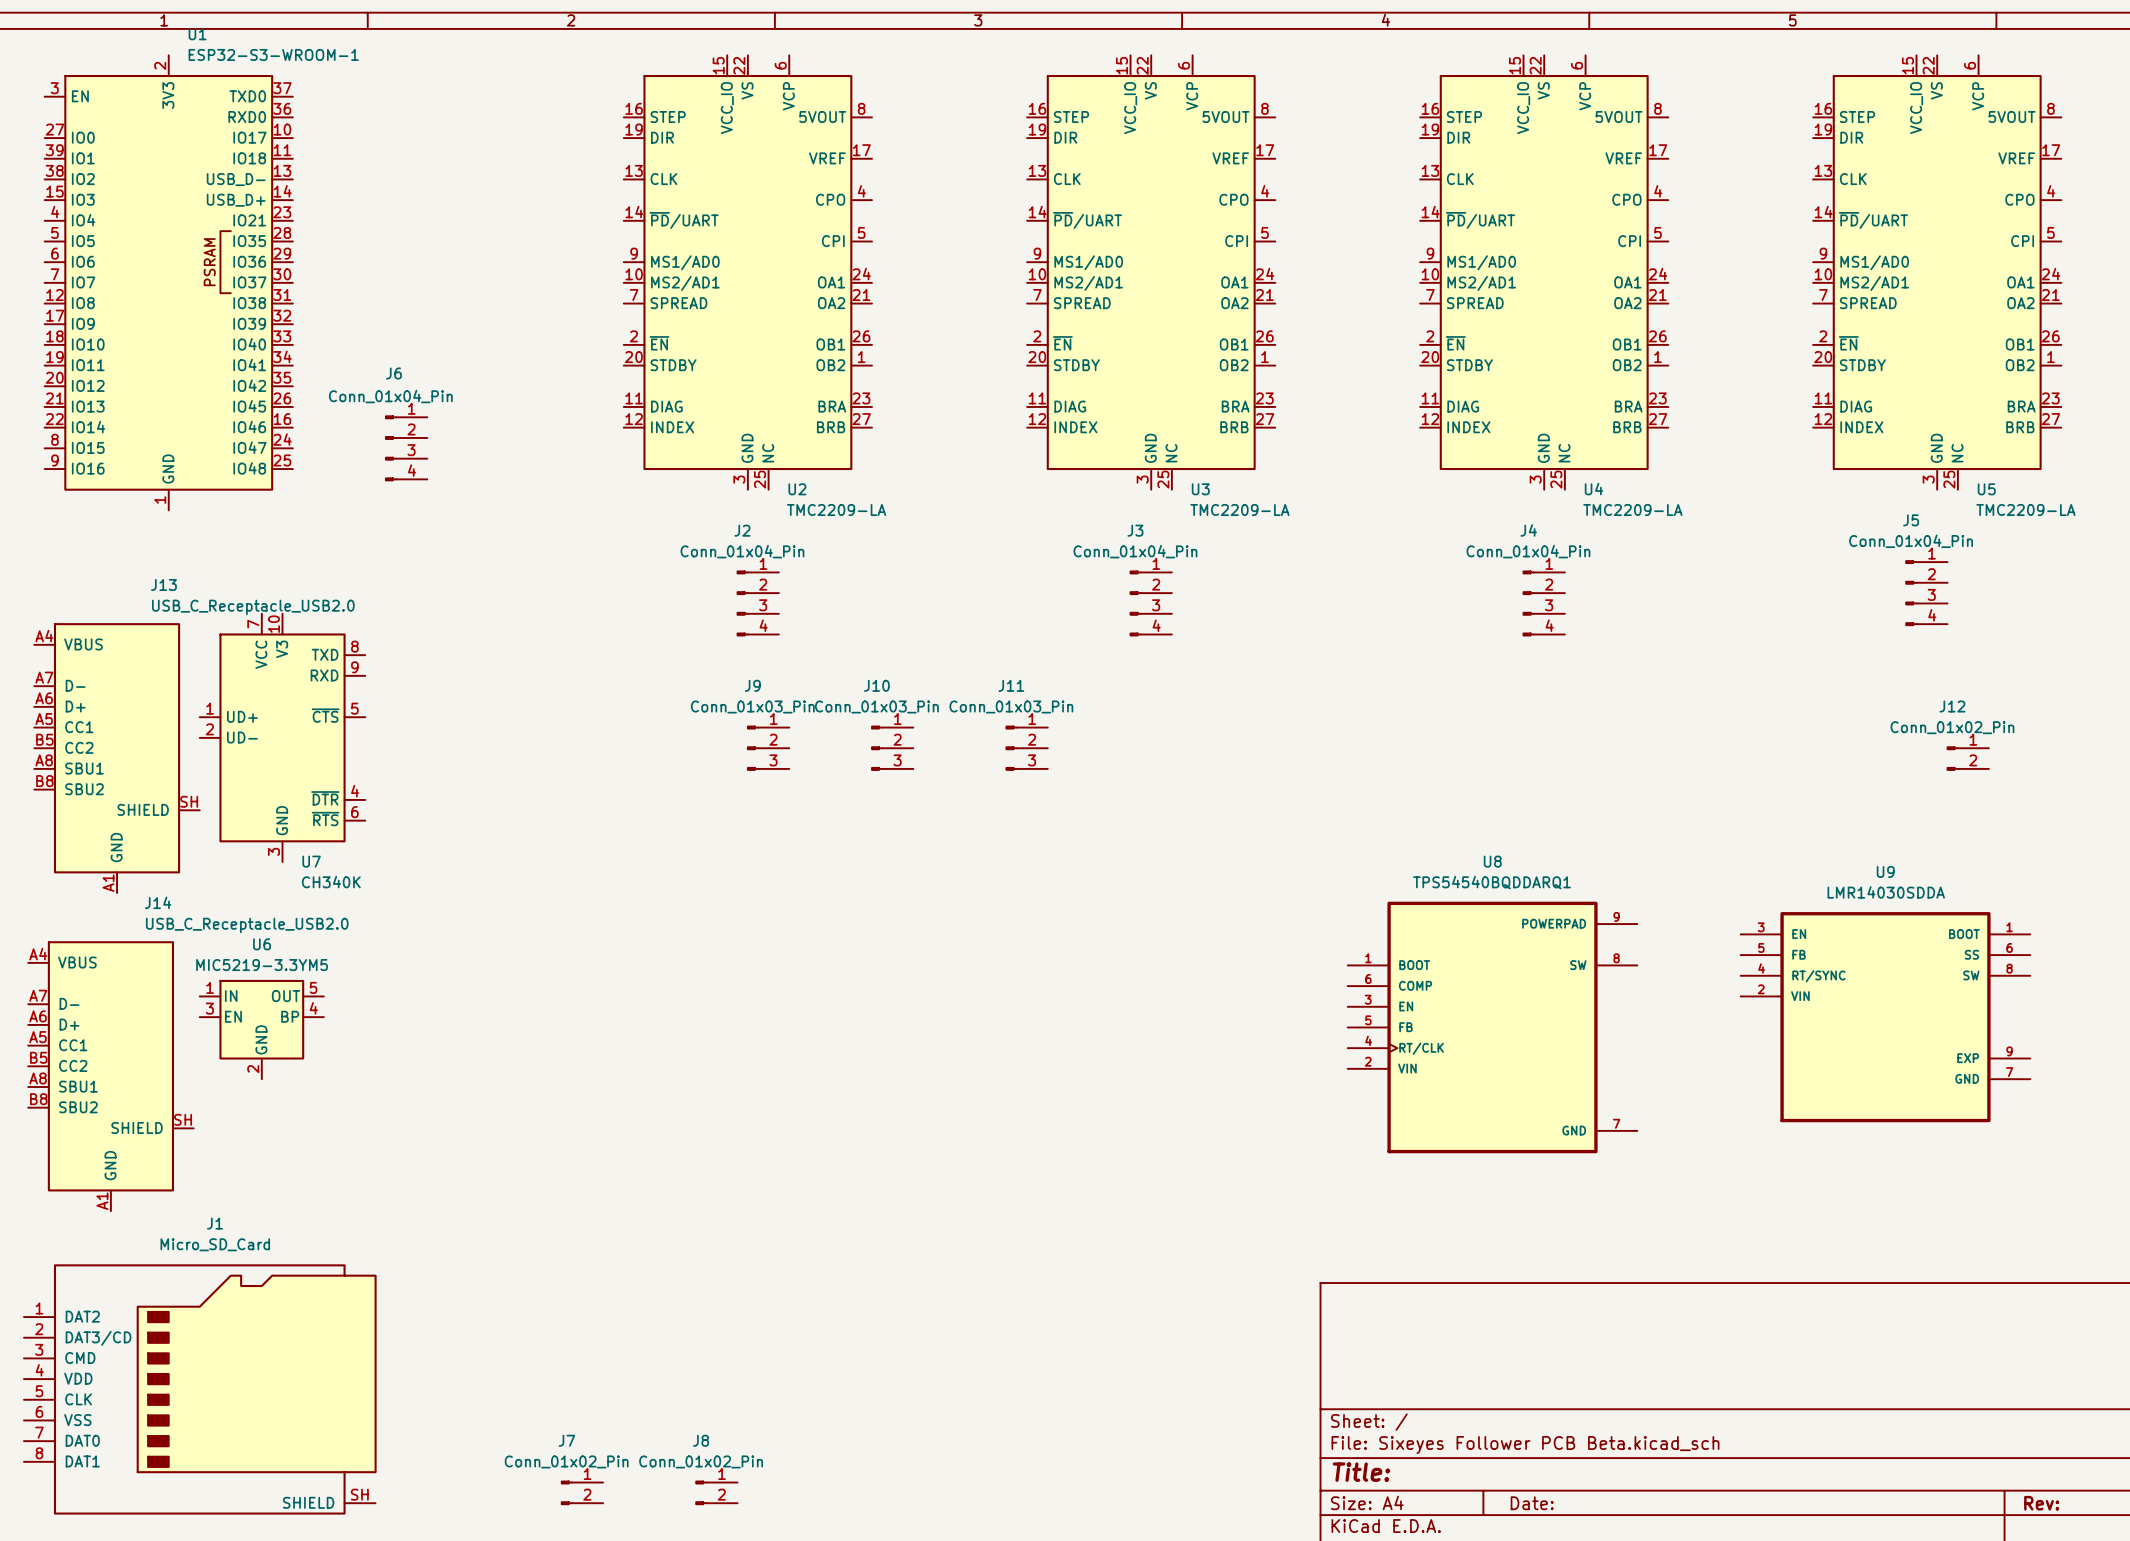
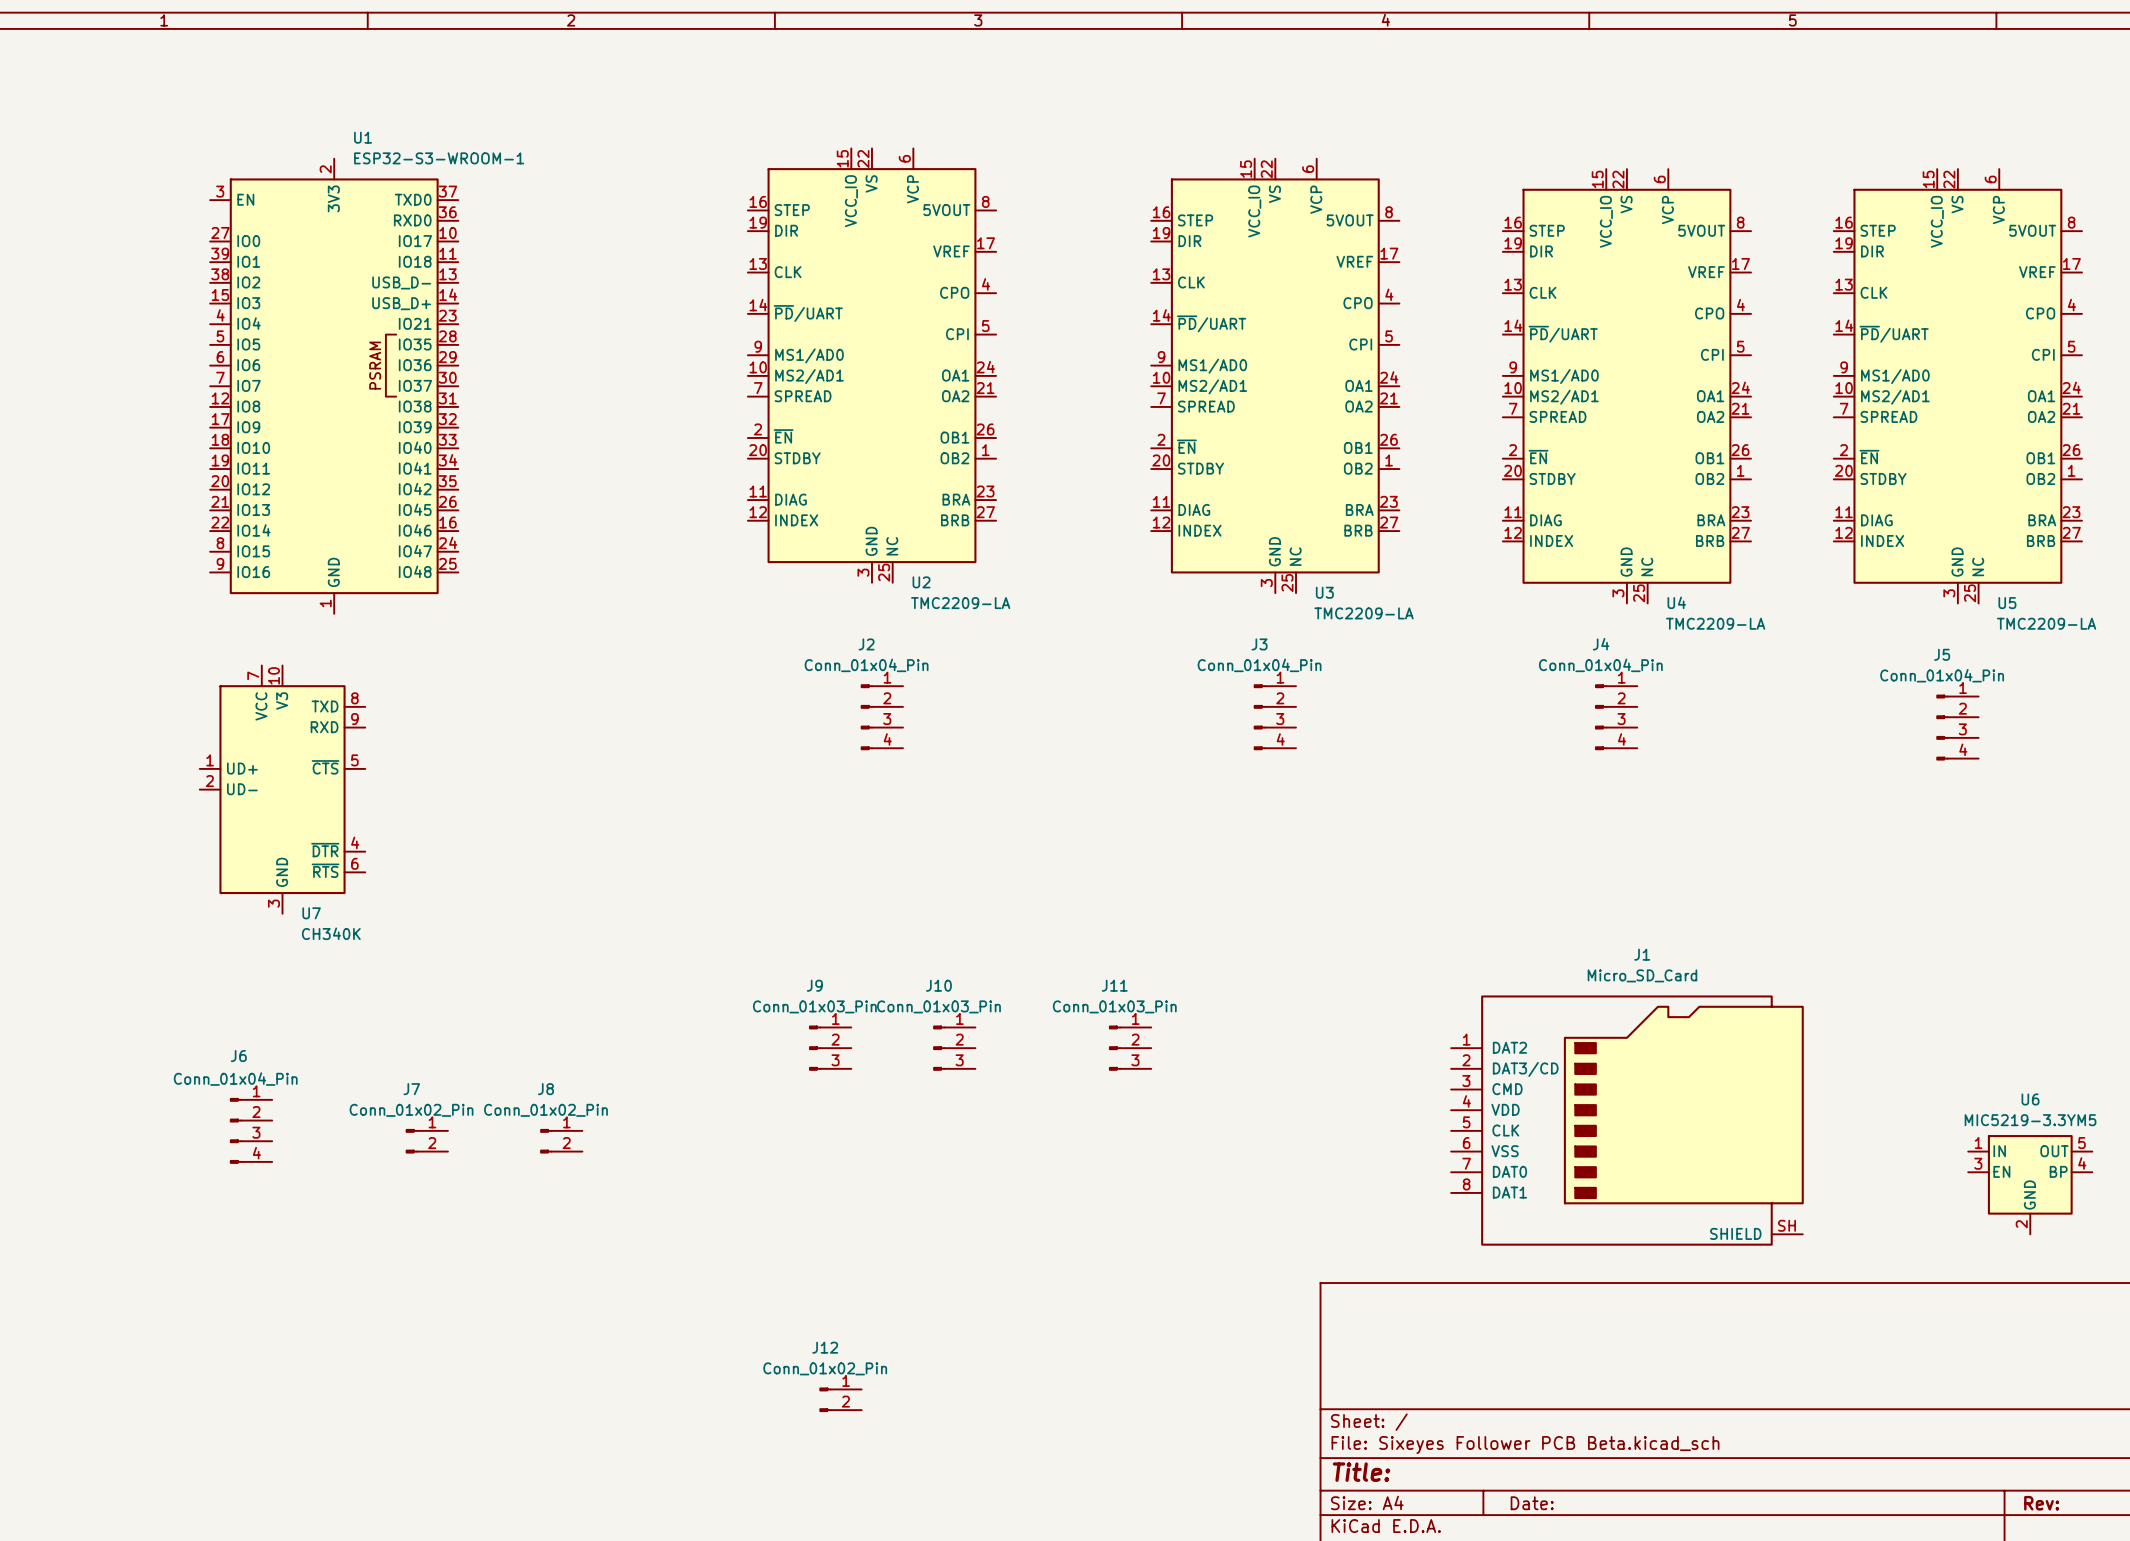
U2 position: (747, 272) -> (871, 365)
U3 position: (1151, 272) -> (1275, 375)
U4 position: (1544, 272) -> (1626, 386)
U5 position: (1937, 272) -> (1957, 386)
U1 position: (168, 282) -> (334, 386)
J6 position: (406, 448) -> (251, 1130)
J5 position: (1926, 593) -> (1957, 727)
J2 position: (757, 603) -> (882, 717)
J3 position: (1150, 603) -> (1275, 717)
J4 position: (1543, 603) -> (1616, 717)
U7 position: (282, 737) -> (282, 789)
J9 position: (768, 748) -> (830, 1048)
J10 position: (892, 748) -> (954, 1048)
J11 position: (1026, 748) -> (1130, 1048)
J13: USB_C_Receptacle_USB2.0 (117, 758) -> none
J12 position: (1967, 758) -> (840, 1399)
U9: LMR14030SDDA (1885, 1017) -> none
U8: TPS54540BQDDARQ1 (1492, 1027) -> none
U6 position: (261, 1029) -> (2030, 1184)
J14: USB_C_Receptacle_USB2.0 (110, 1076) -> none
J1 position: (200, 1389) -> (1627, 1120)
J7 position: (582, 1492) -> (426, 1141)
J8 position: (716, 1492) -> (561, 1141)

